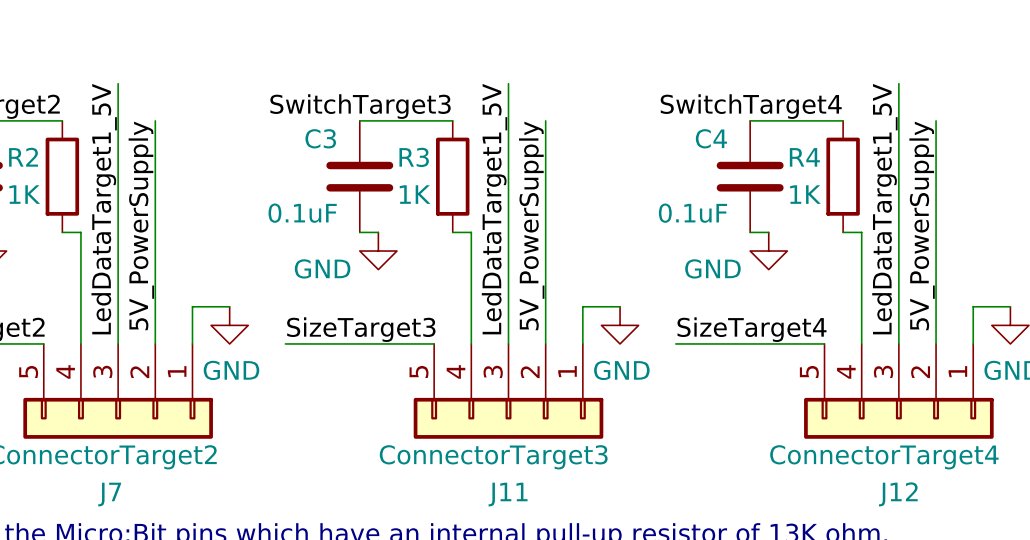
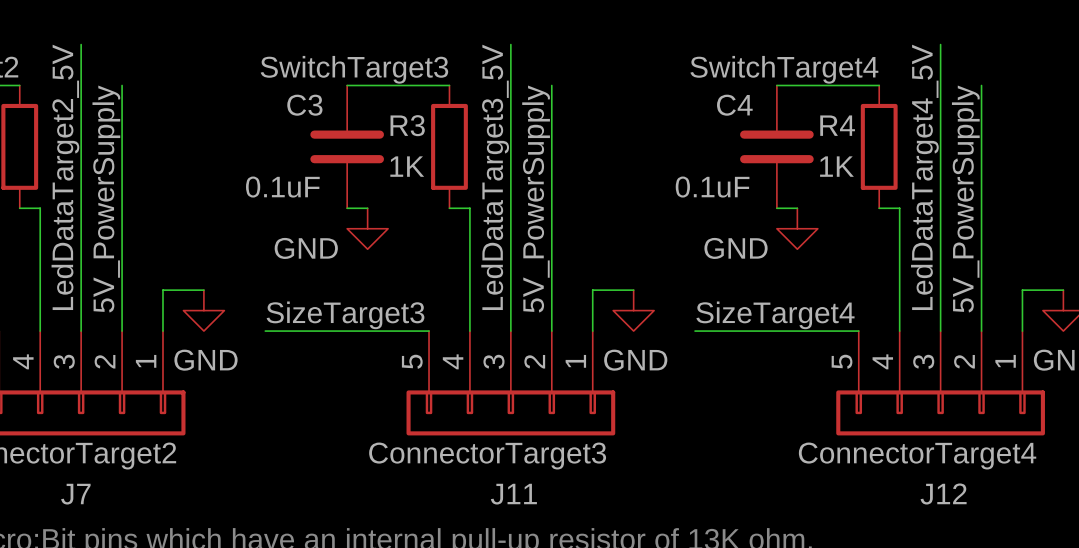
label: LedDataTarget1_5V (104, 209) -> LedDataTarget2_5V (65, 177)
label: LedDataTarget1_5V (494, 209) -> LedDataTarget3_5V (495, 177)
label: LedDataTarget1_5V (884, 209) -> LedDataTarget4_5V (924, 177)

